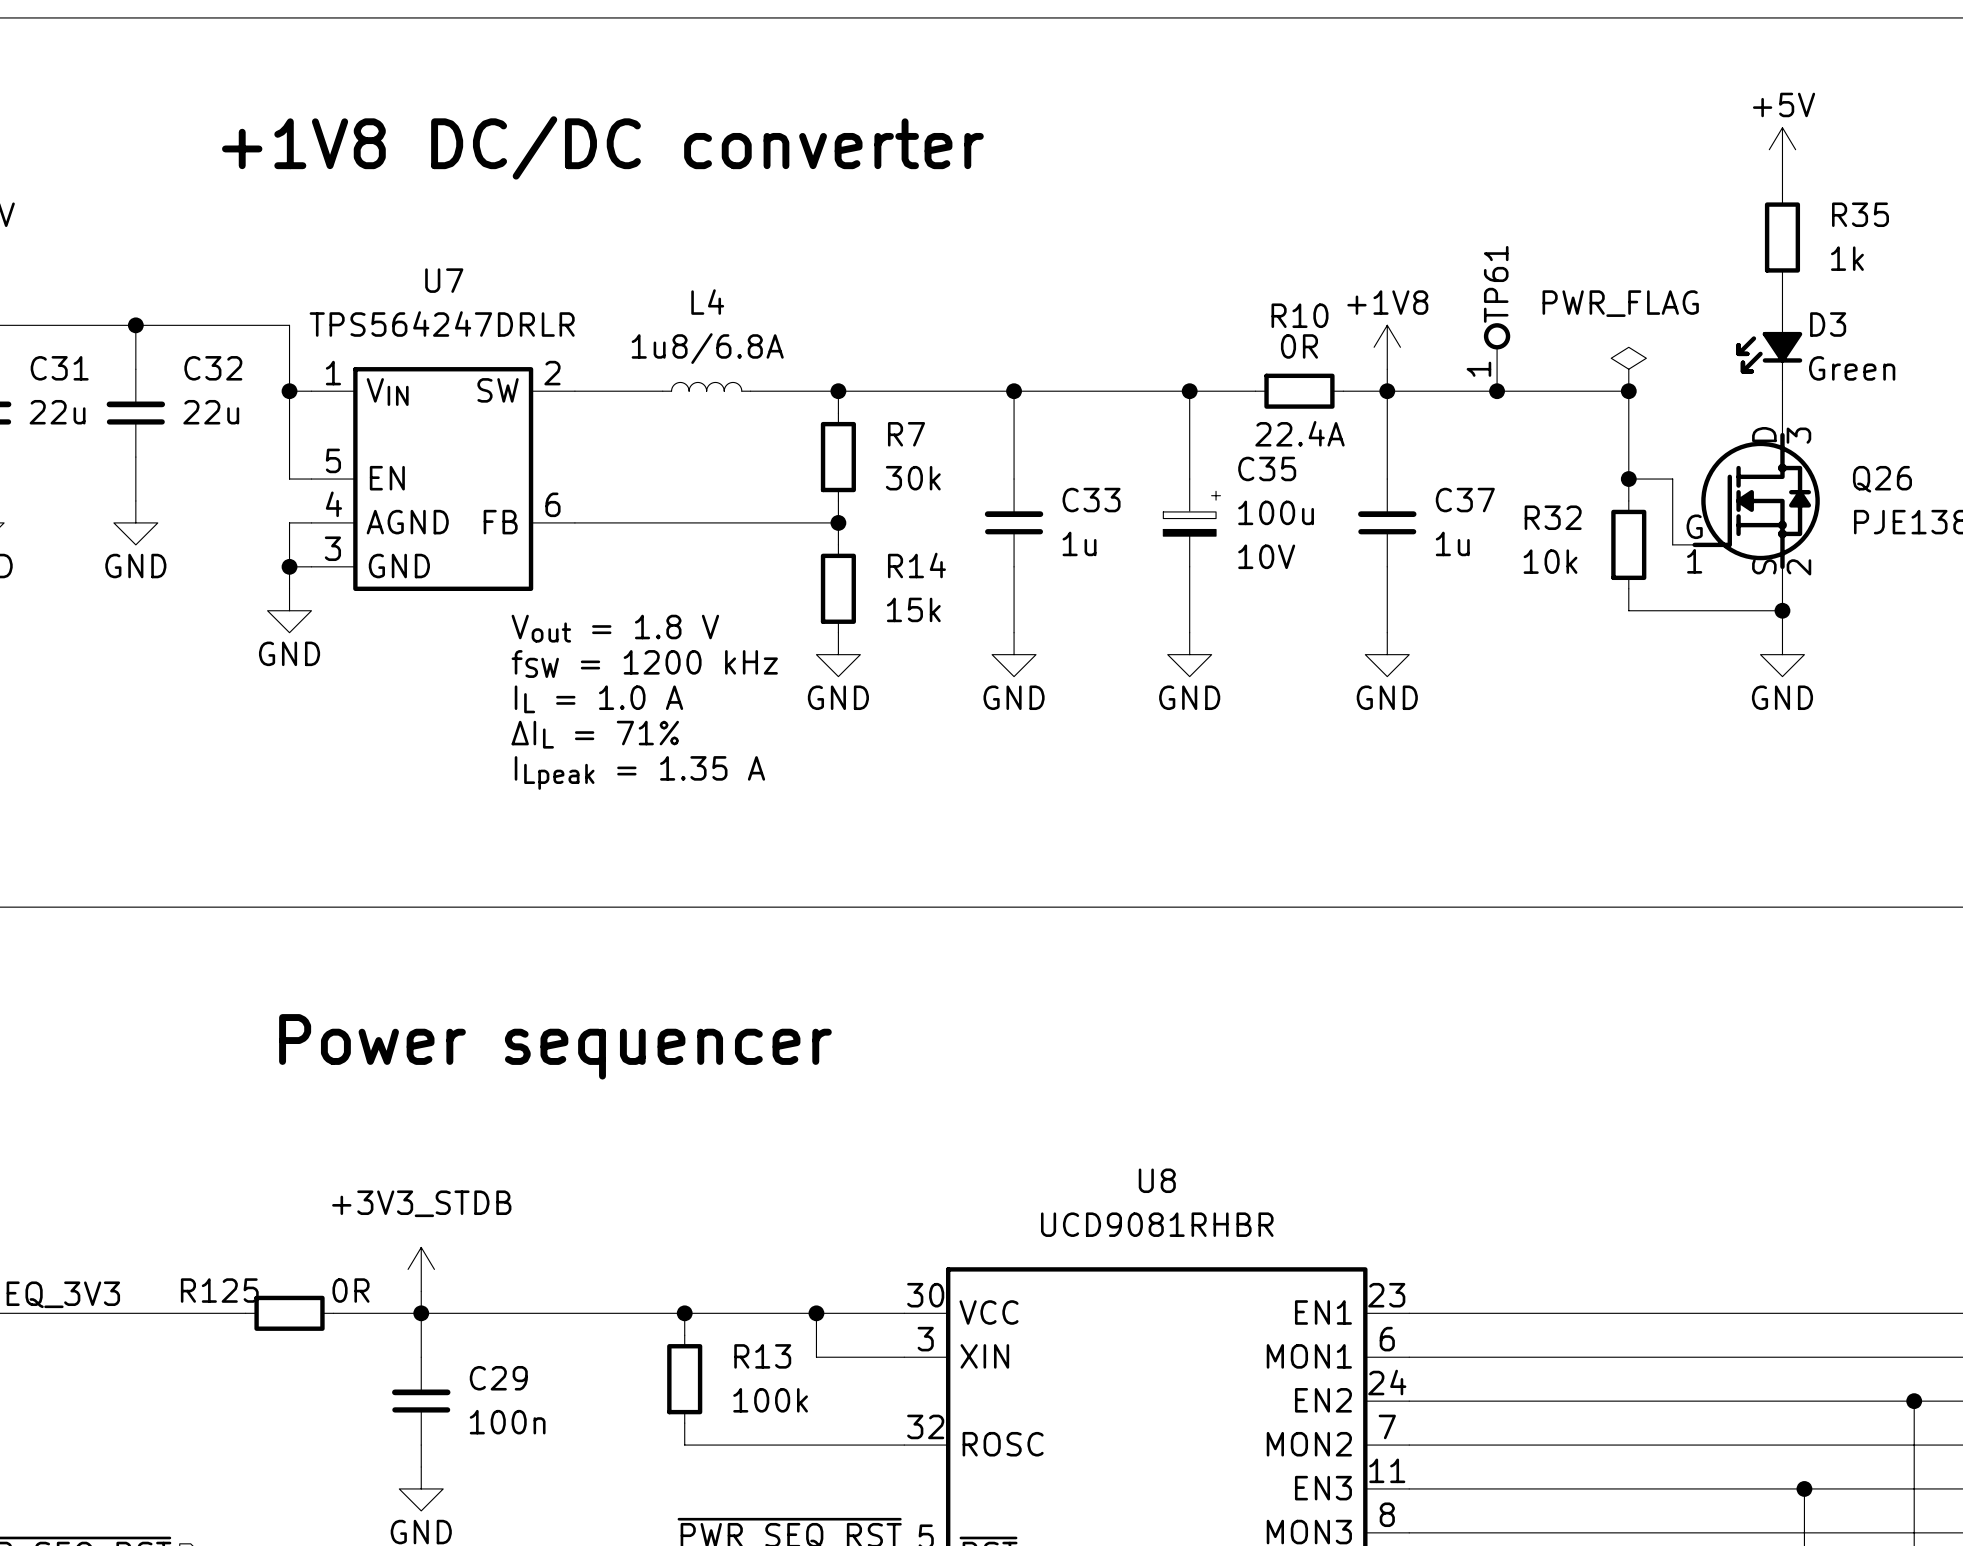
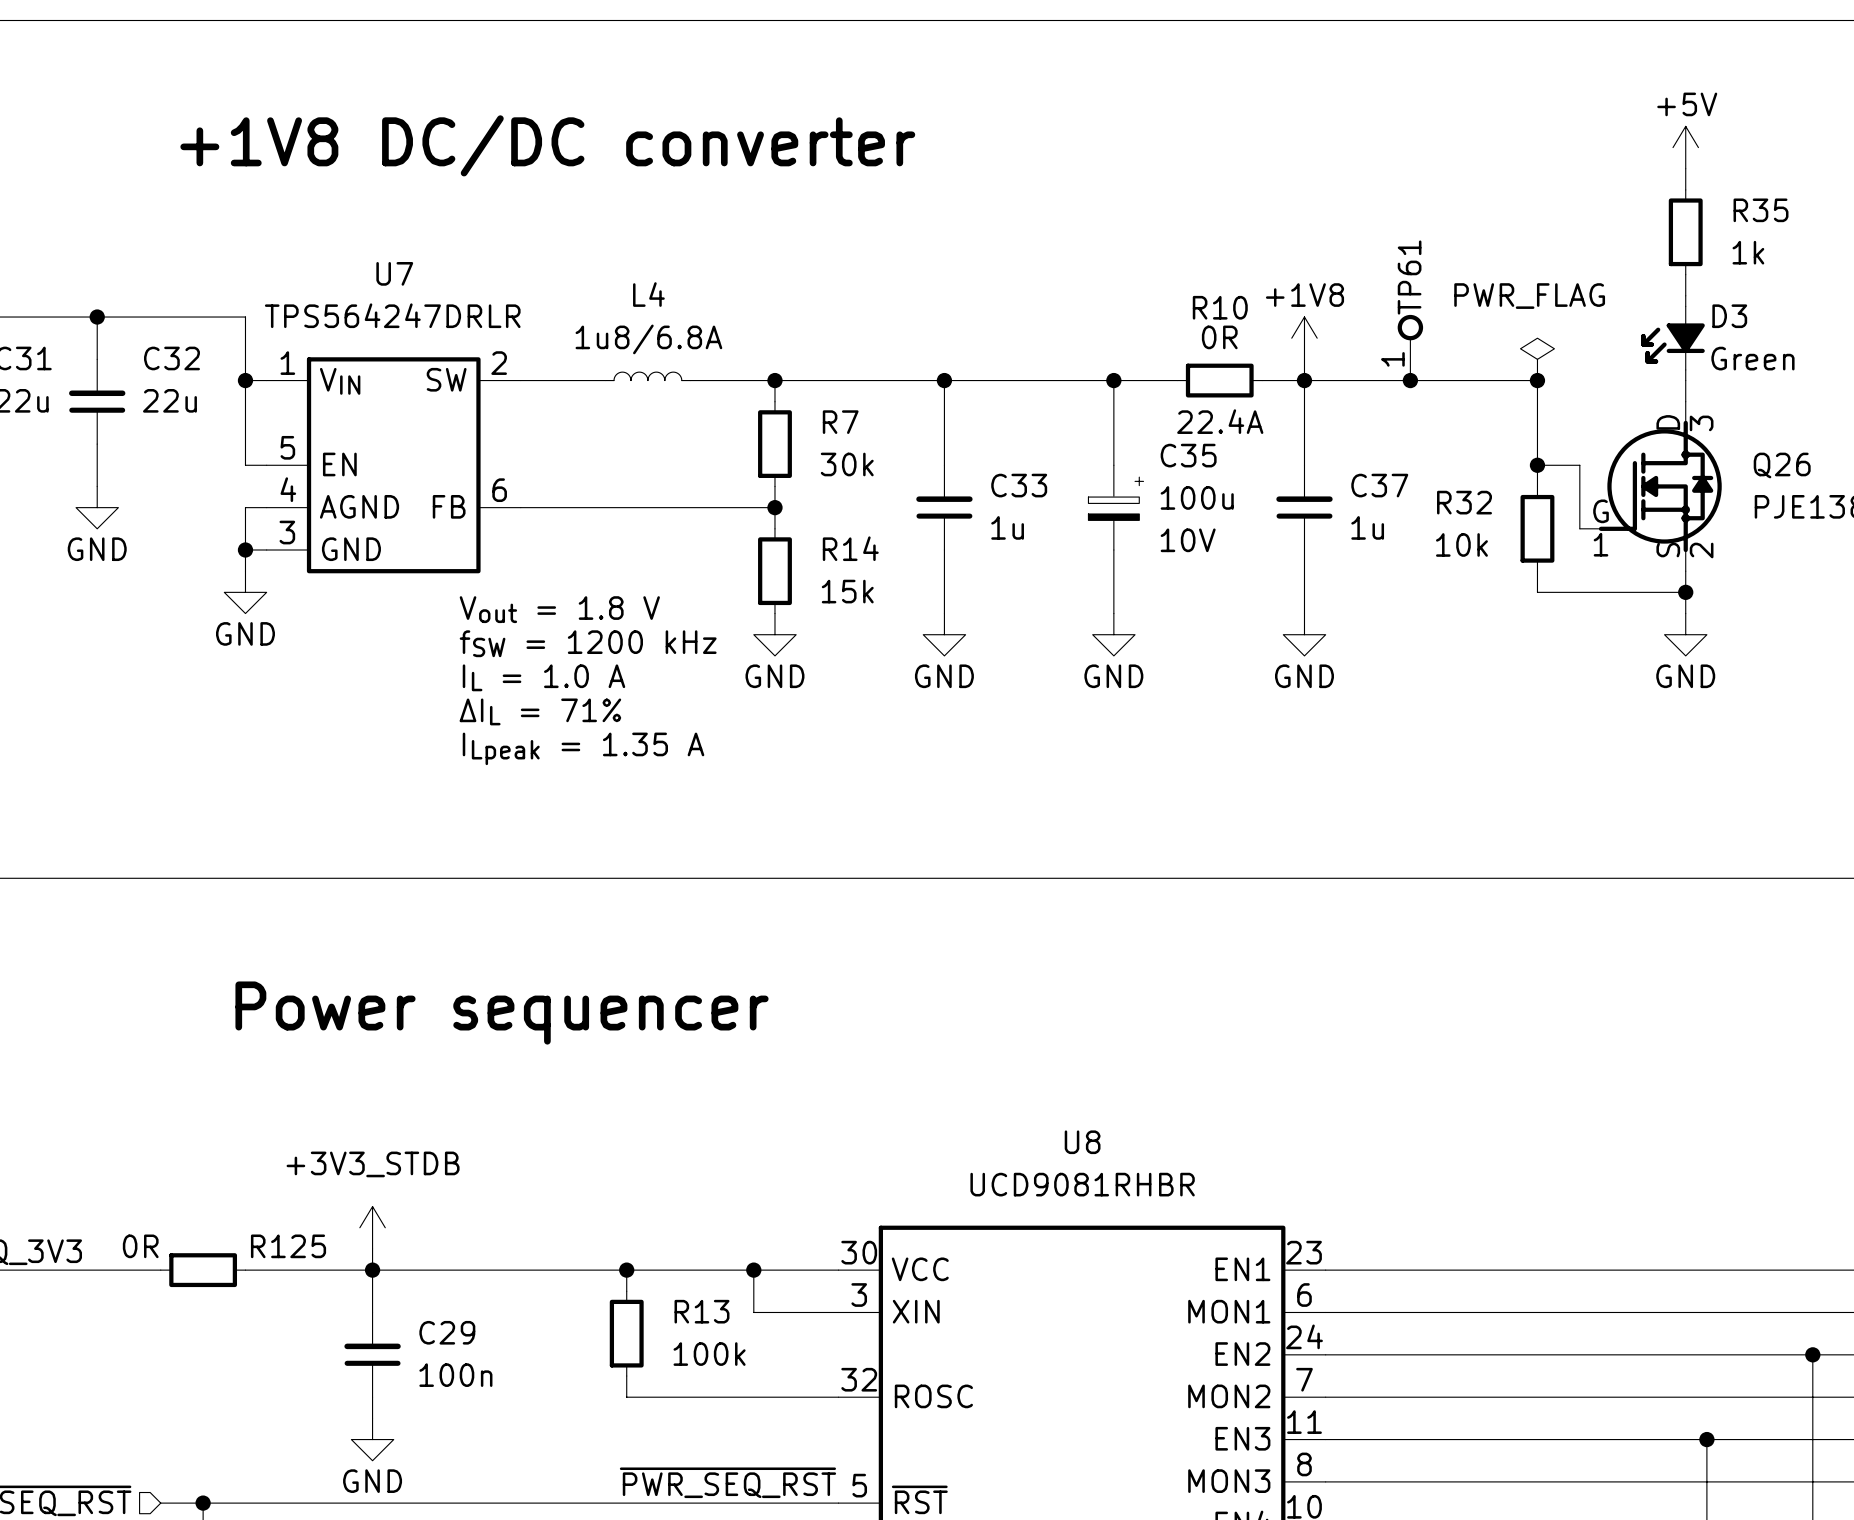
R125 name position: R125 (219, 1290) -> R125 (288, 1246)
R125 text position: 0R (351, 1290) -> 0R (140, 1246)
wire: (201, 1313) (245, 1313) -> (245, 1270) (287, 1270)
R125 position: (289, 1313) -> (203, 1270)

